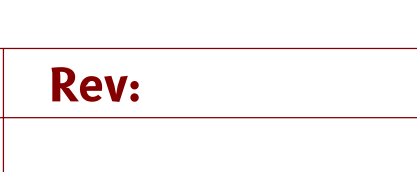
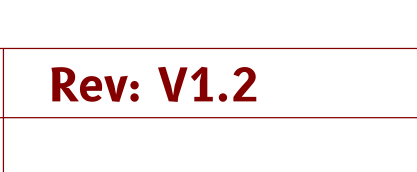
title block: Rev: (95, 84) -> Rev: V1.2 (153, 84)

